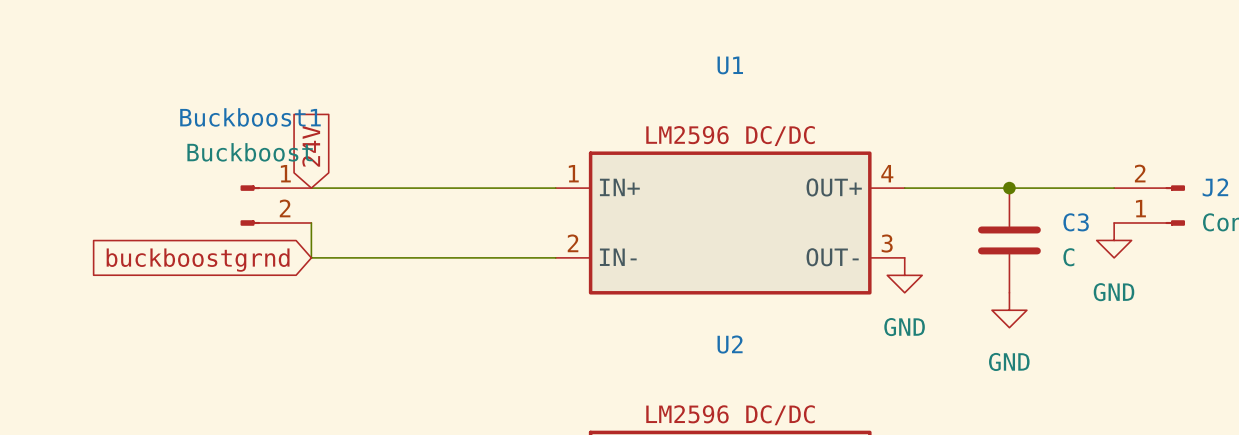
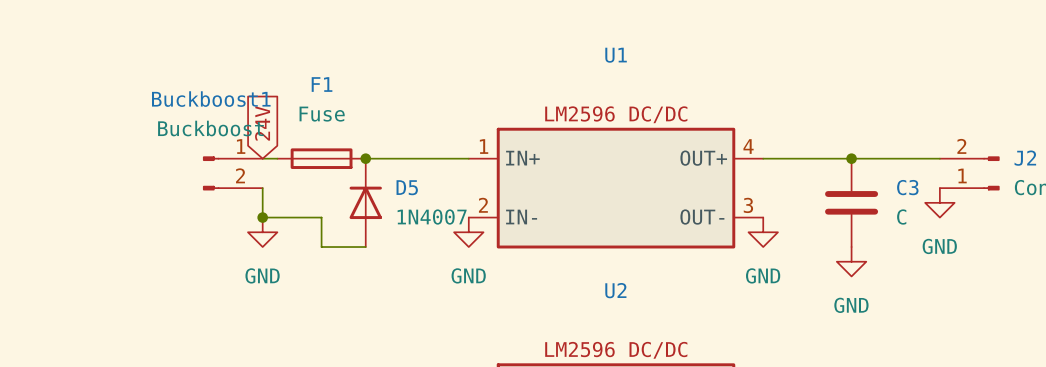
F1: none -> Fuse (321, 158)
junction: none -> (365, 158)
D5: none -> 1N4007 (365, 202)
junction: none -> (262, 217)
wire: (381, 257) (555, 257) -> (321, 217) (321, 247) (365, 247)
global label: buckboostgrnd (198, 260) -> none
power symbol: none -> GND (262, 232)
power symbol: none -> GND (468, 232)

